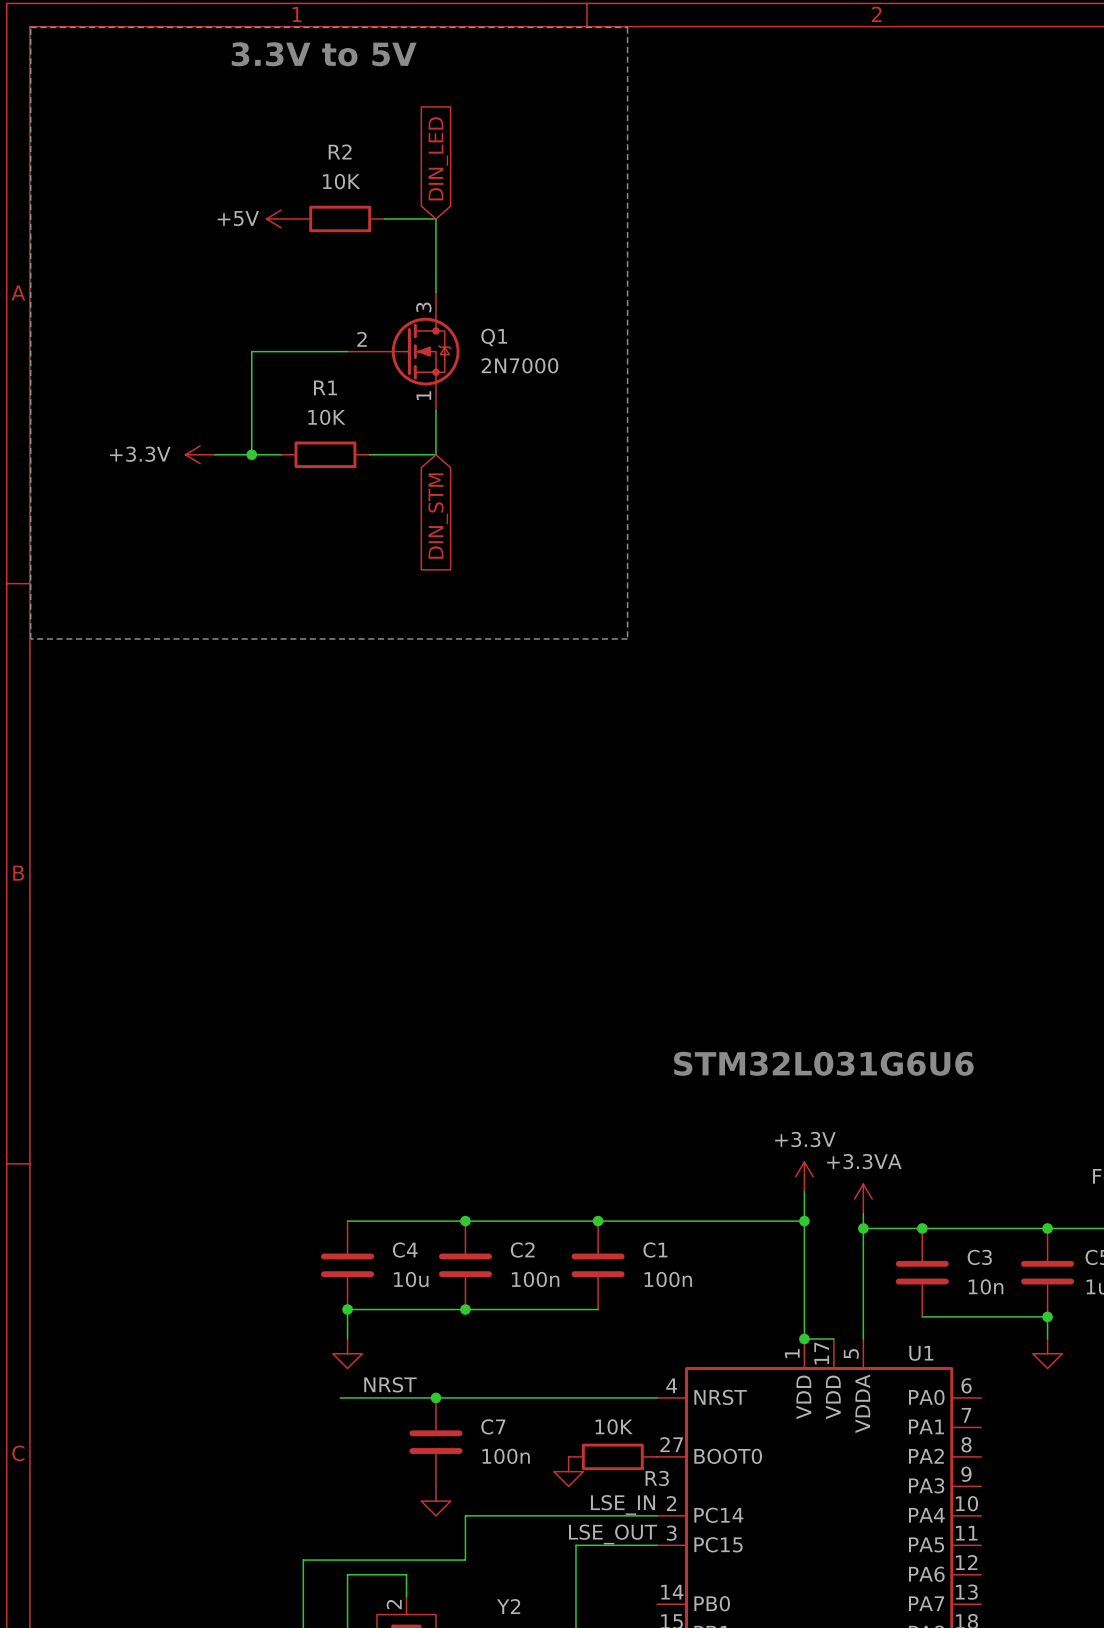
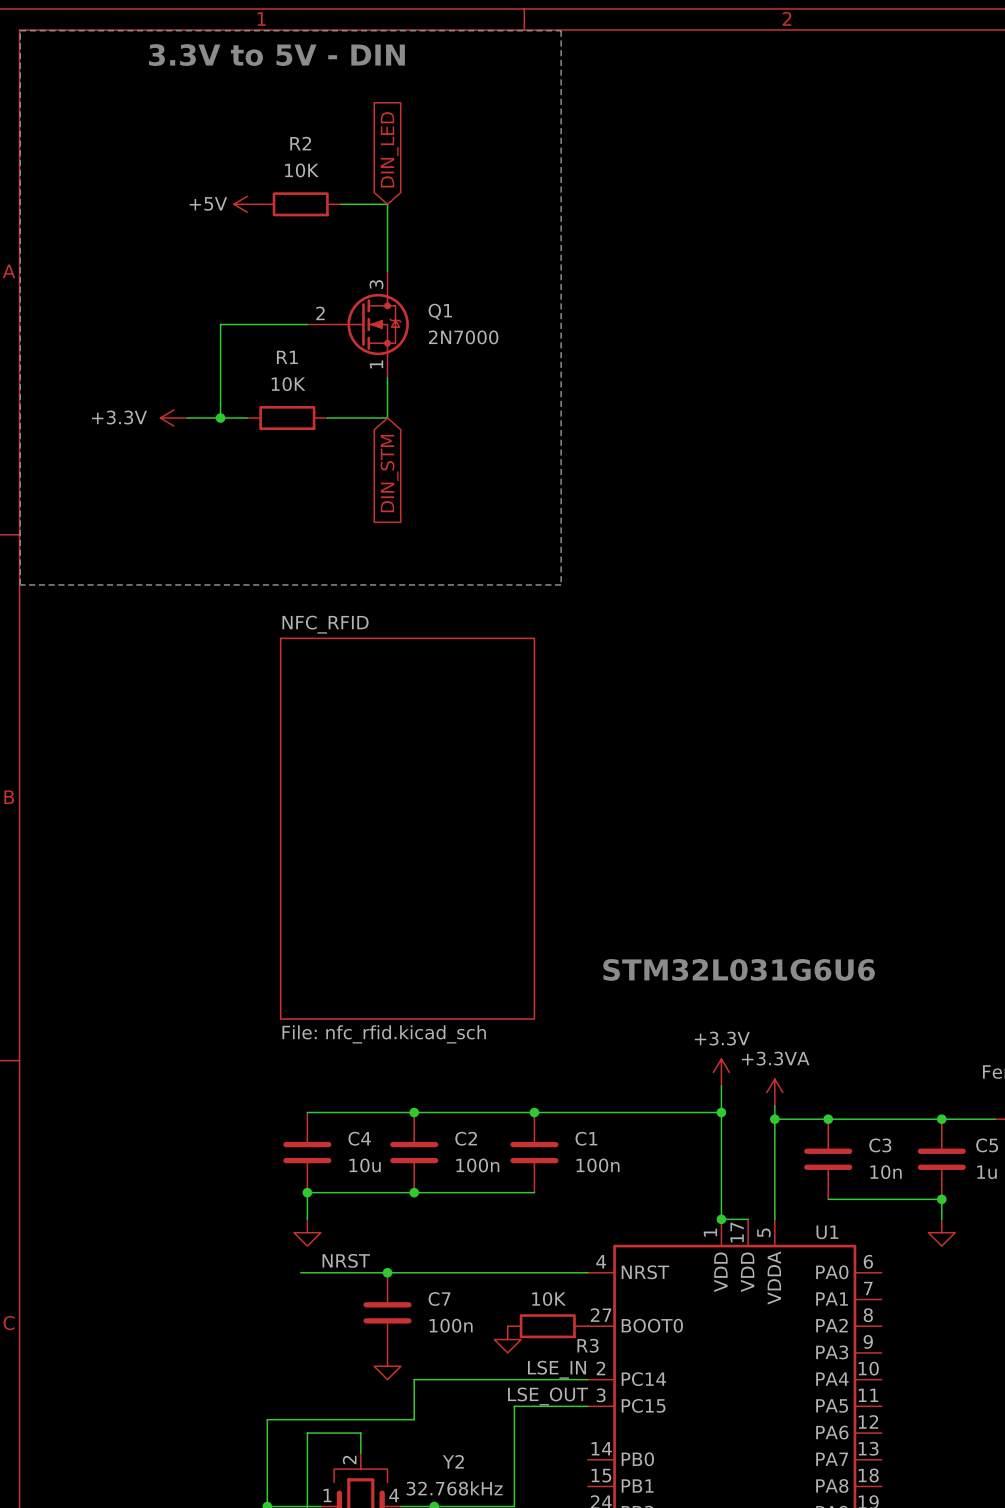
text: 3.3V to 5V (324, 54) -> 3.3V to 5V - DIN (276, 55)
sheet NFC_RFID: none -> File: nfc_rfid.kicad_sch (407, 828)

